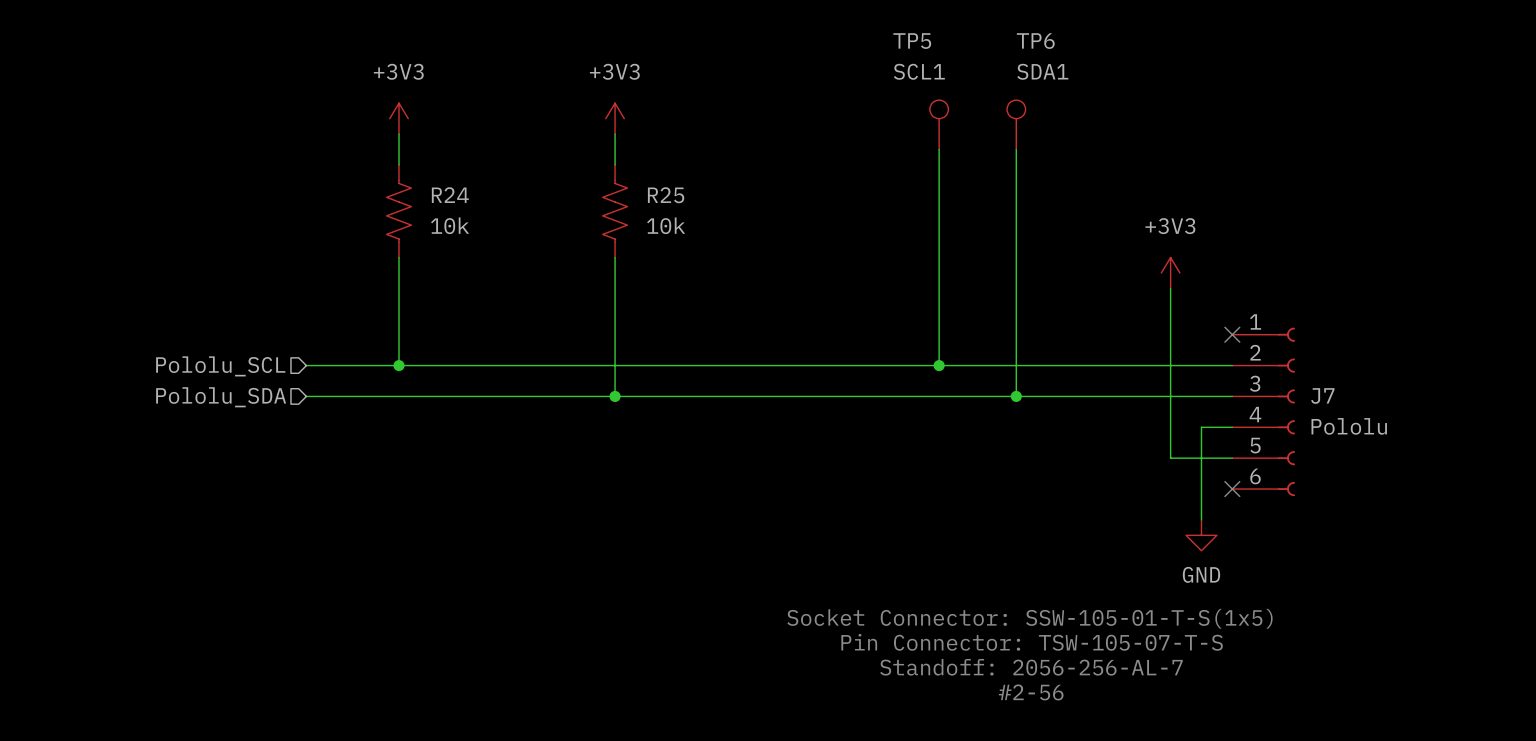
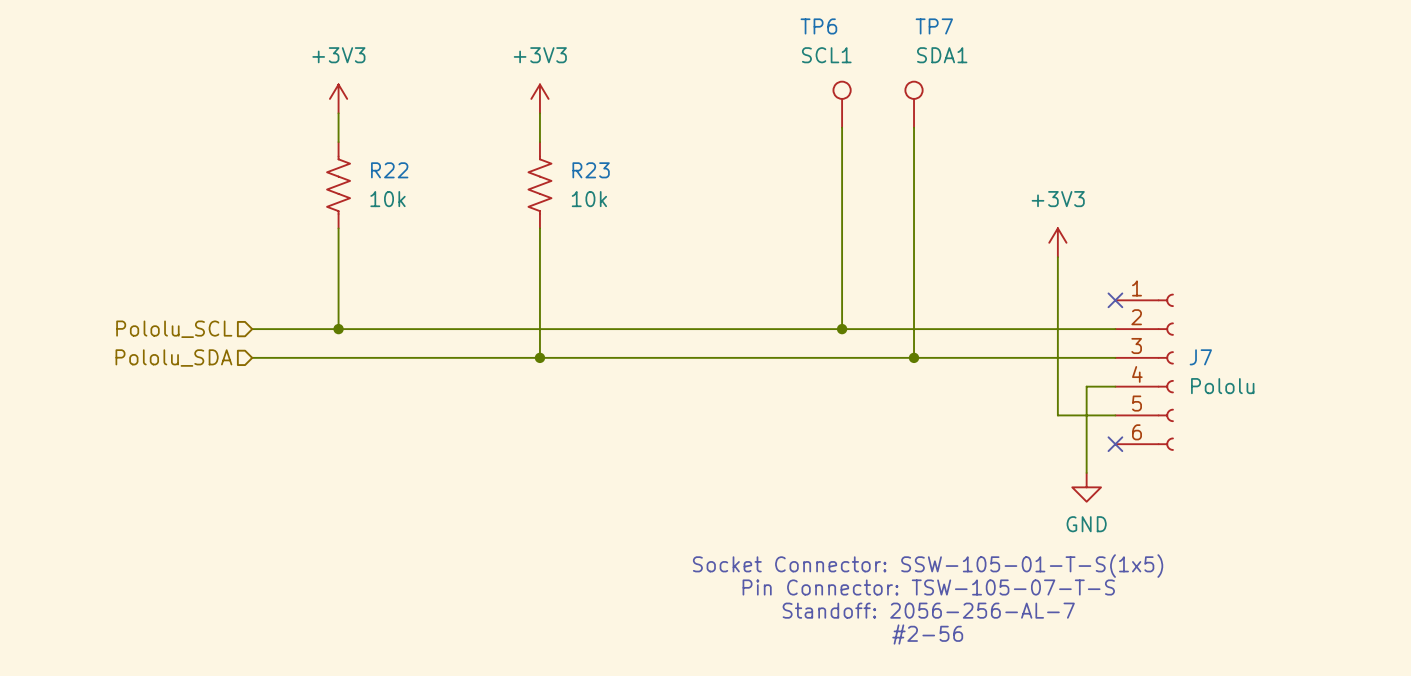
TP5 name: TP5 (912, 41) -> TP6 (818, 26)
TP6 name: TP6 (1035, 41) -> TP7 (934, 26)
R24 name: R24 (450, 195) -> R22 (389, 170)
R25 name: R25 (666, 195) -> R23 (591, 170)

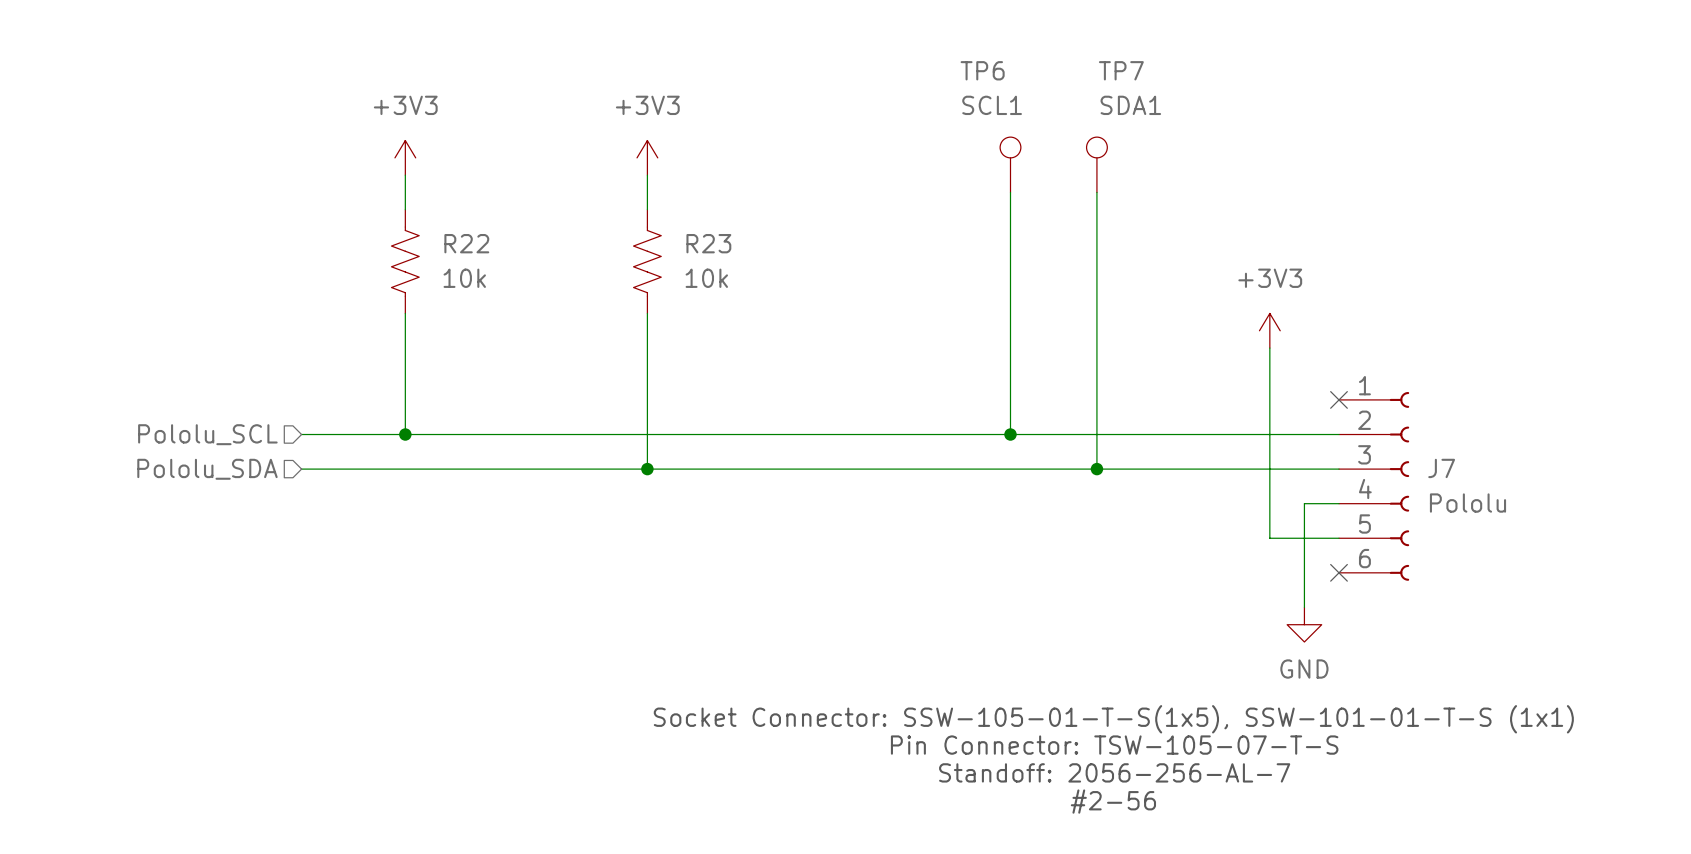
text: Socket Connector: SSW-105-01-T-S(1x5) (928, 566) -> Socket Connector: SSW-105-01-T-S(1x5), SSW-101-01-T-S (1x1) (1113, 719)

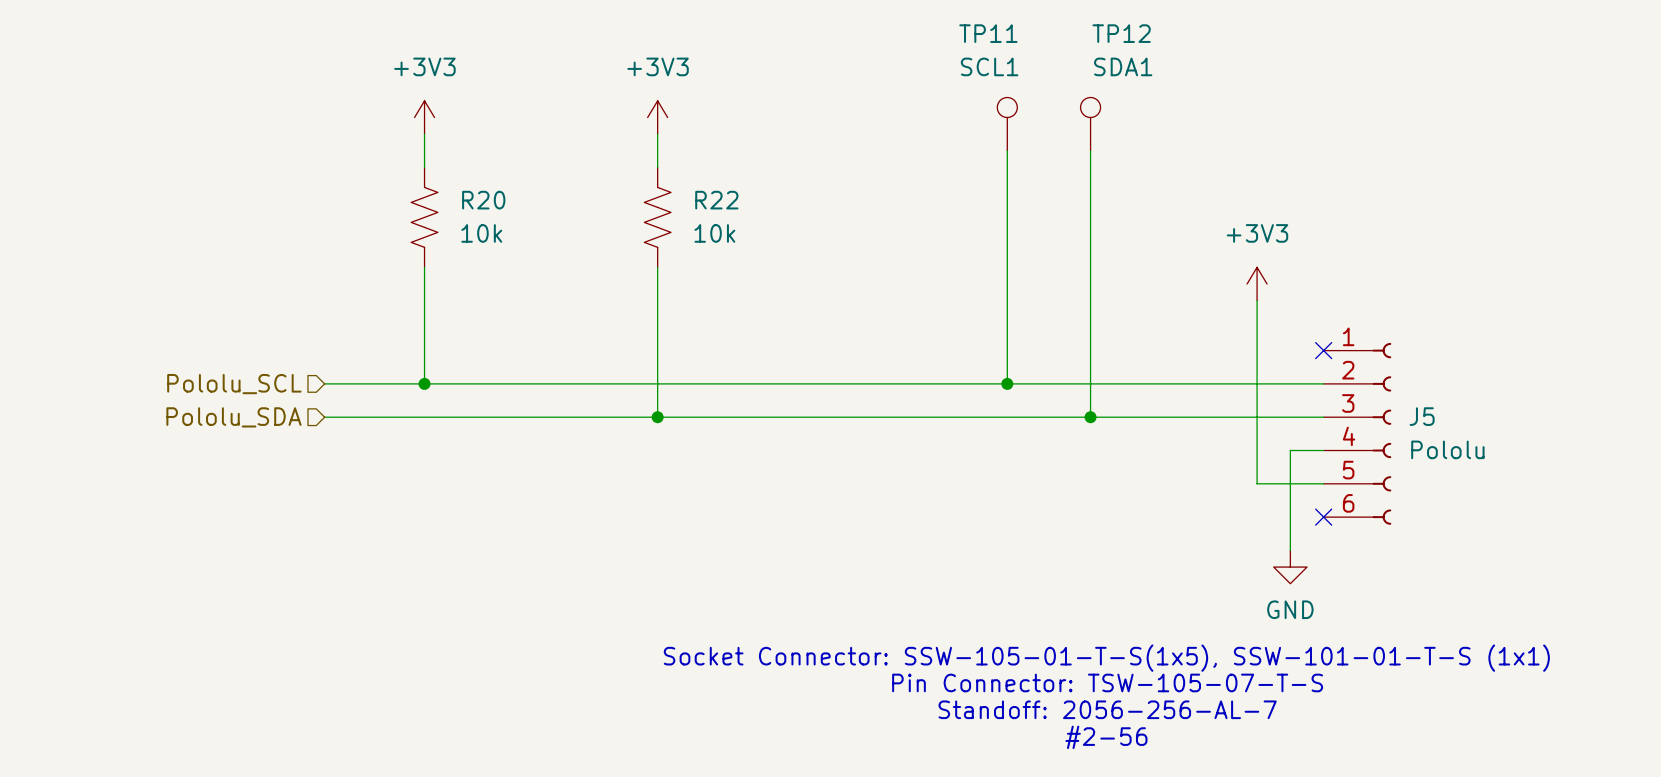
TP6 name: TP6 (982, 70) -> TP11 (988, 33)
TP7 name: TP7 (1121, 70) -> TP12 (1121, 33)
R22 name: R22 (466, 243) -> R20 (483, 200)
R23 name: R23 (708, 243) -> R22 (716, 200)
J7 name: J7 (1441, 468) -> J5 (1422, 416)

